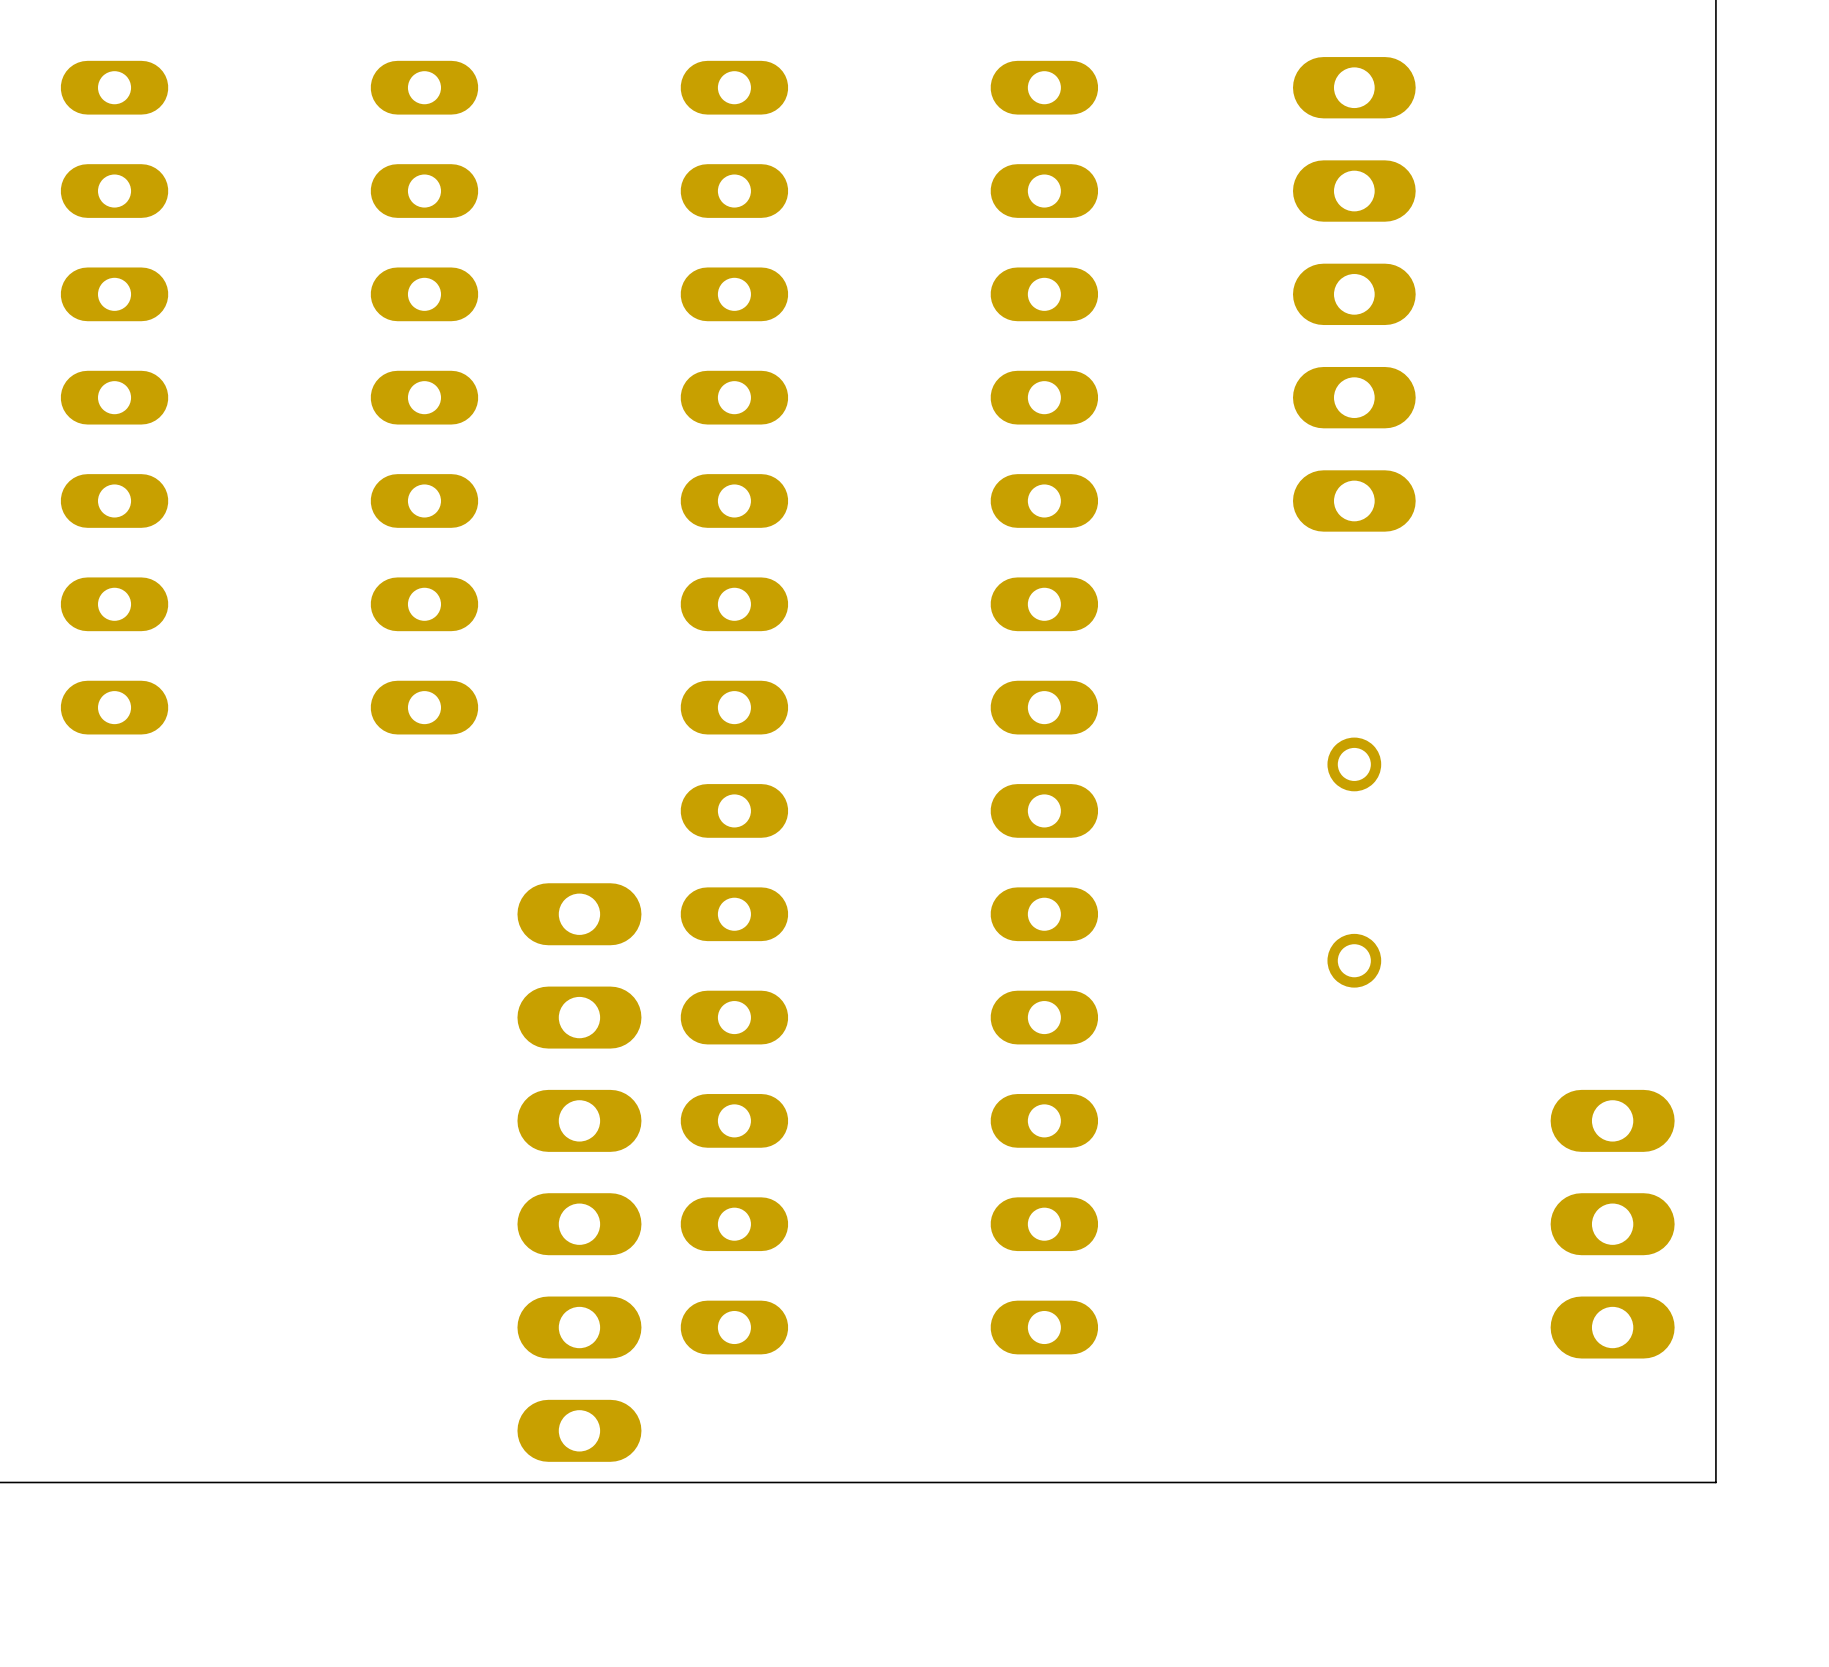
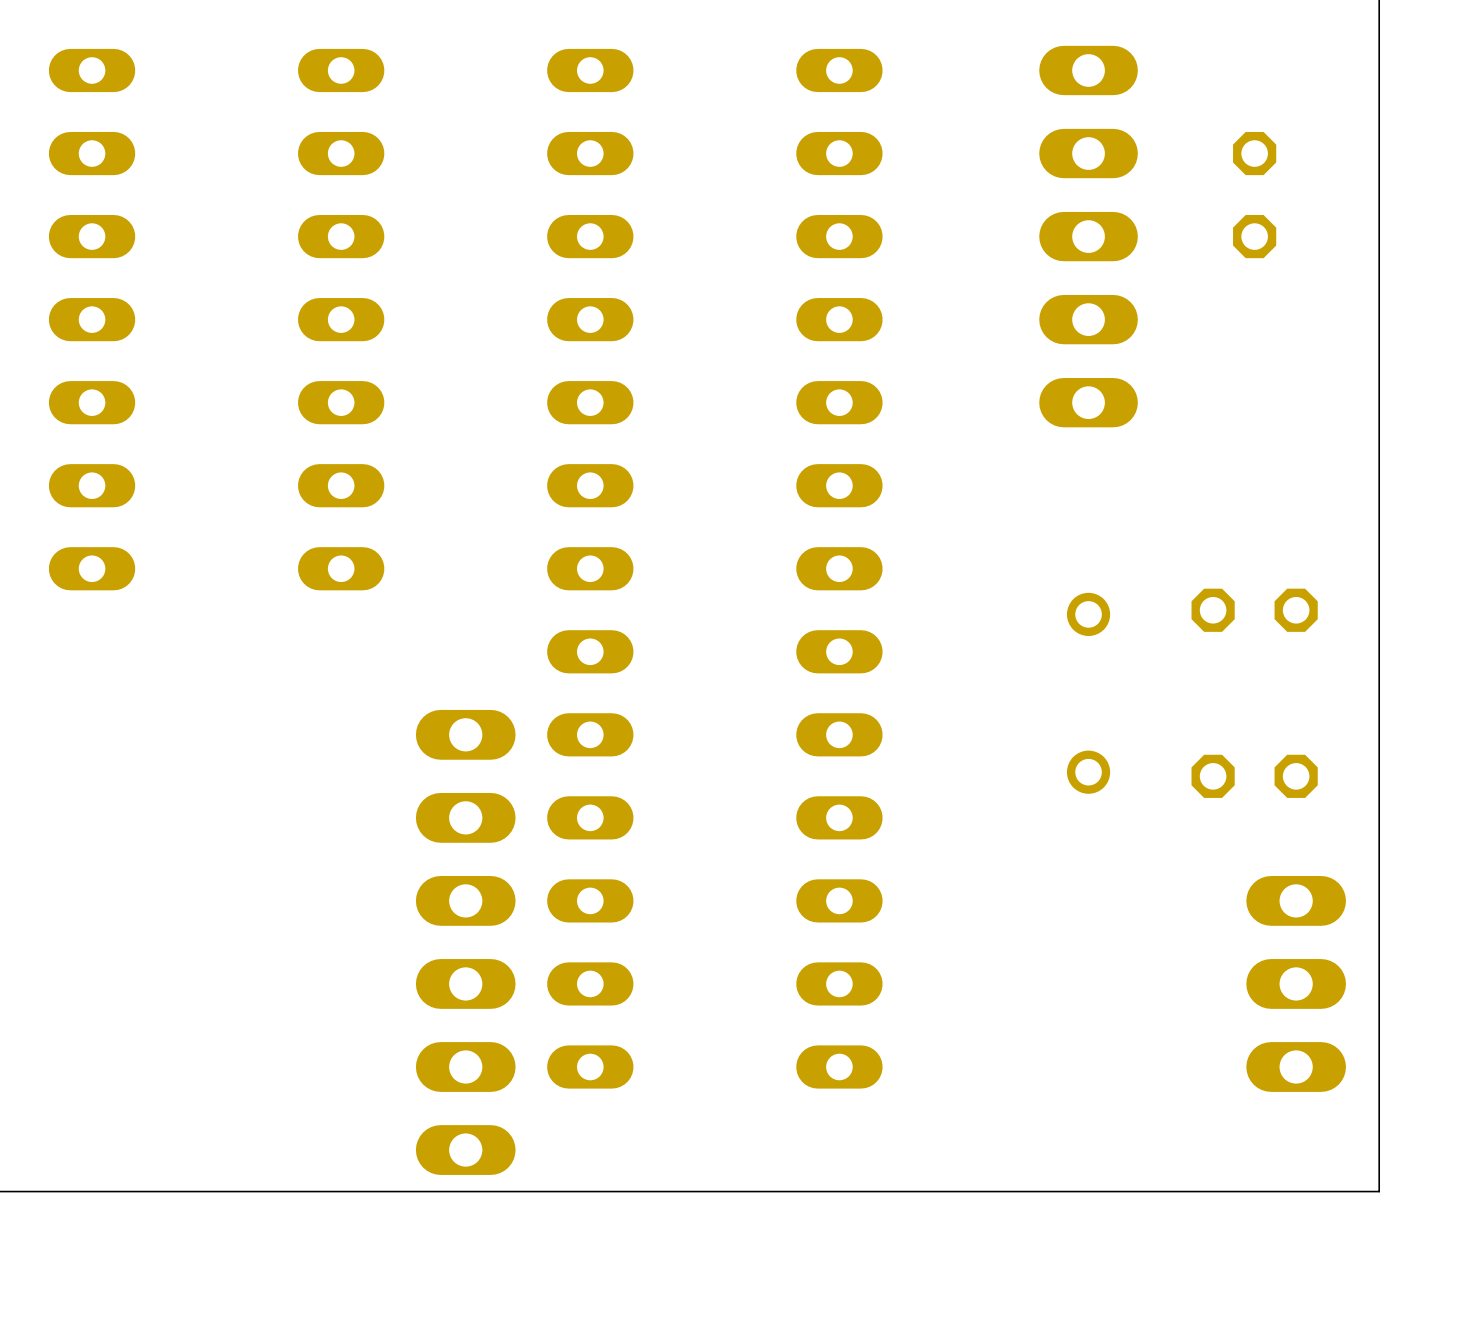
part: none -> (1254, 195)
part: none -> (1254, 610)
part: none -> (1254, 776)

